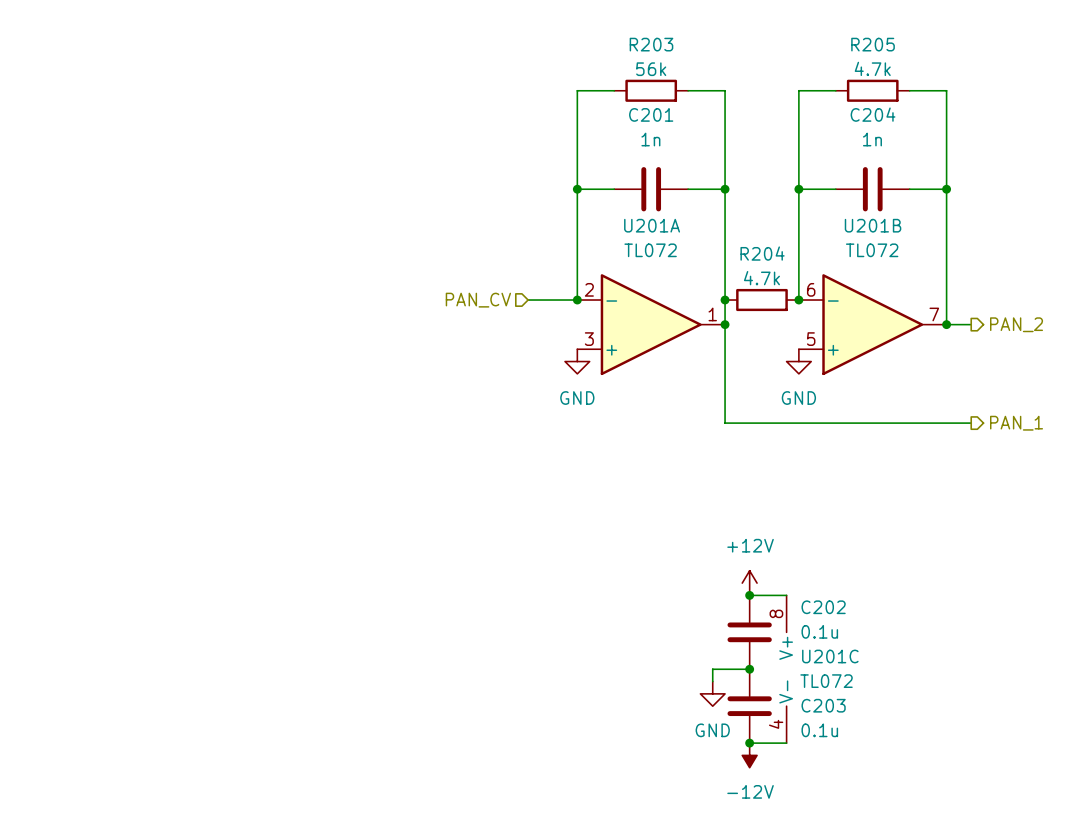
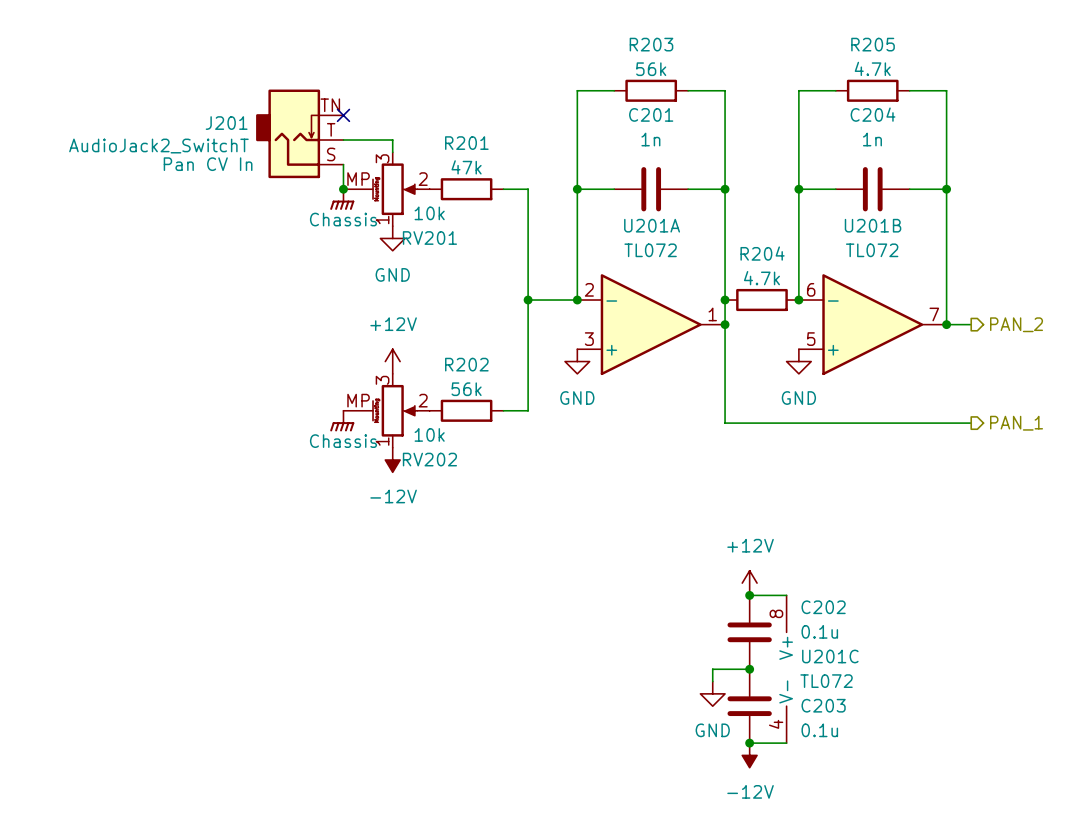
no-connect mark: none -> (343, 115)
J201: none -> AudioJack2_SwitchT (299, 133)
wire: none -> (343, 140) (392, 140) (392, 152)
wire: none -> (343, 164) (343, 189)
junction: none -> (343, 189)
RV201: none -> 10k (386, 189)
R201: none -> 47k (466, 189)
wire: none -> (503, 189) (528, 189) (528, 410) (503, 410)
power symbol: none -> Chassis (342, 199)
power symbol: none -> GND (392, 238)
hierarchical label: PAN_CV (478, 300) -> none
junction: none -> (528, 300)
power symbol: none -> +12V (392, 361)
RV202: none -> 10k (386, 410)
R202: none -> 56k (466, 410)
power symbol: none -> Chassis (342, 421)
power symbol: none -> -12V (392, 460)

